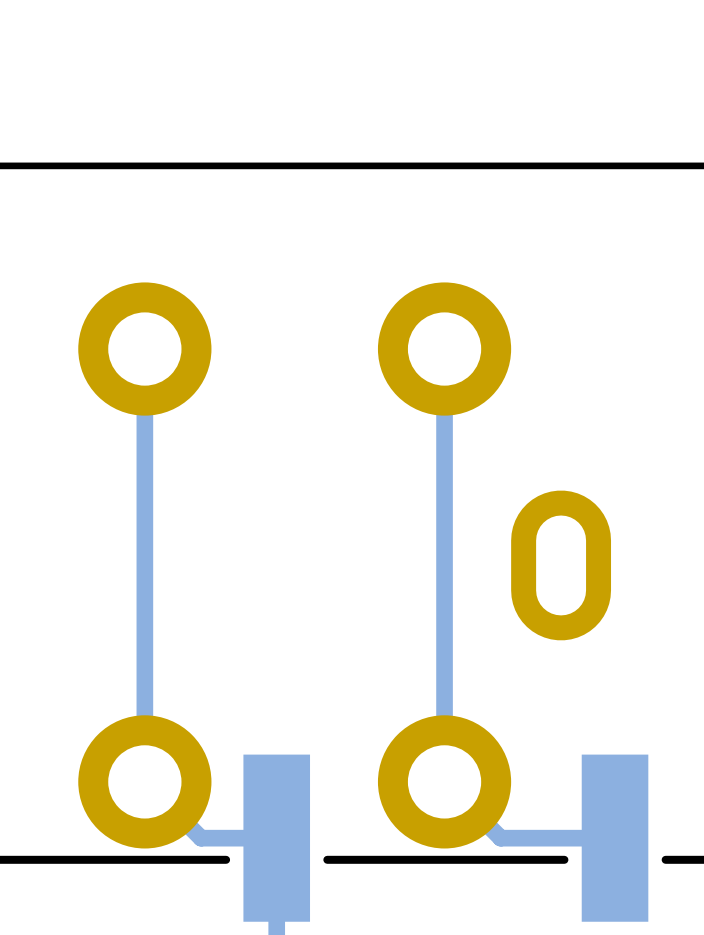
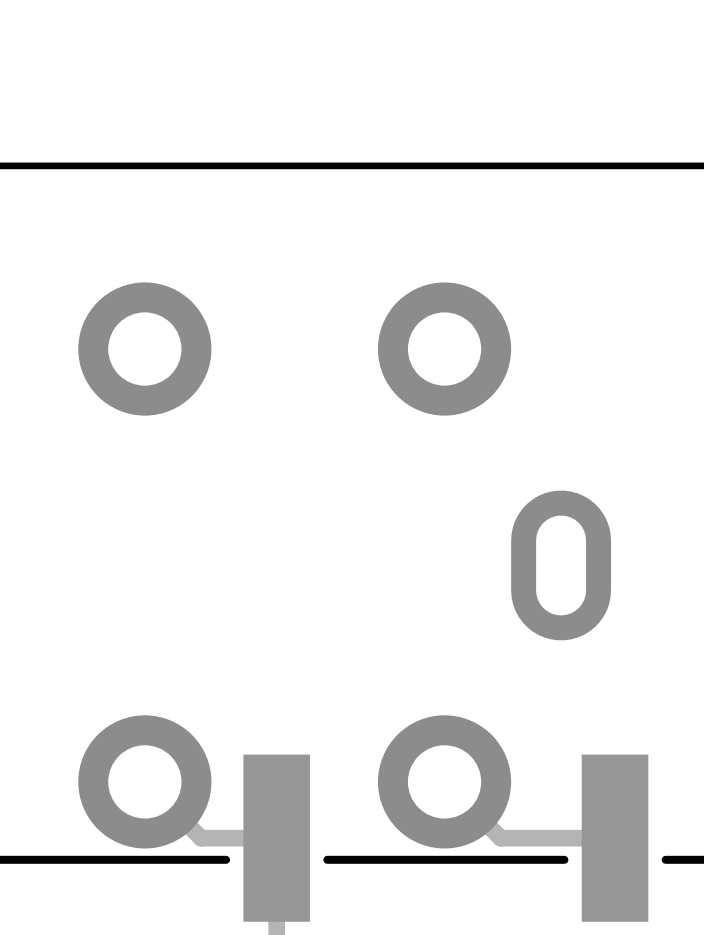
track: (144, 349) (144, 781) -> none
track: (444, 349) (444, 781) -> none

